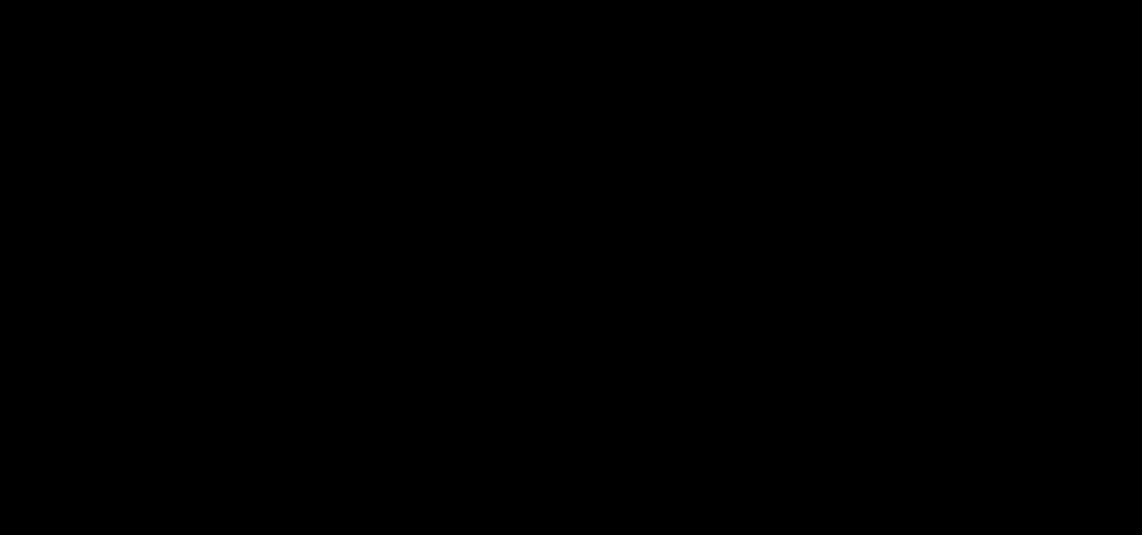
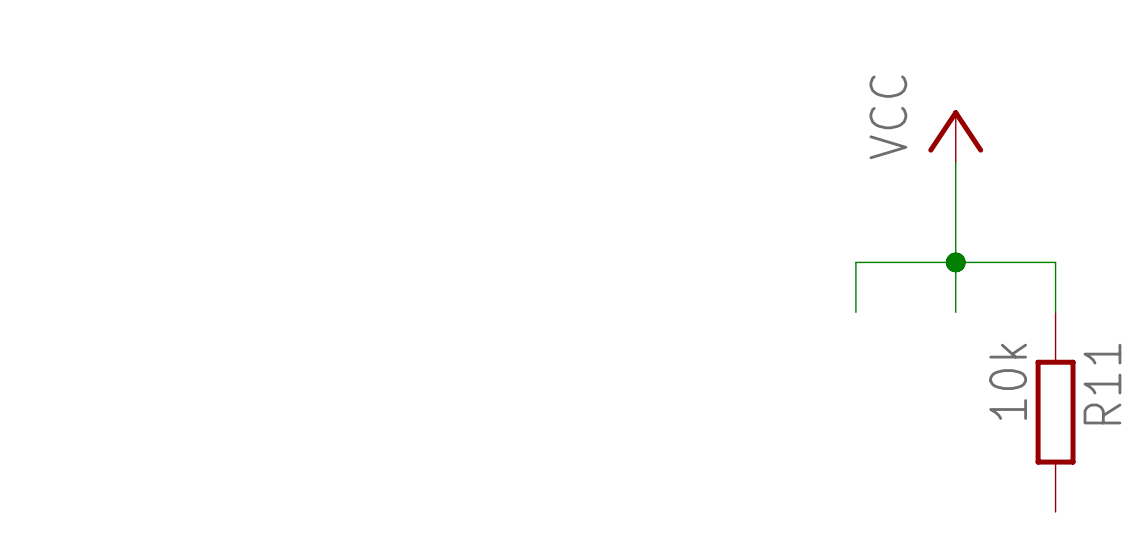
power symbol: none -> VCC (955, 136)
wire: none -> (955, 162) (955, 312)
junction: none -> (955, 262)
wire: none -> (855, 312) (855, 262) (1055, 262) (1055, 312)
R11: none -> 10k (1055, 412)

